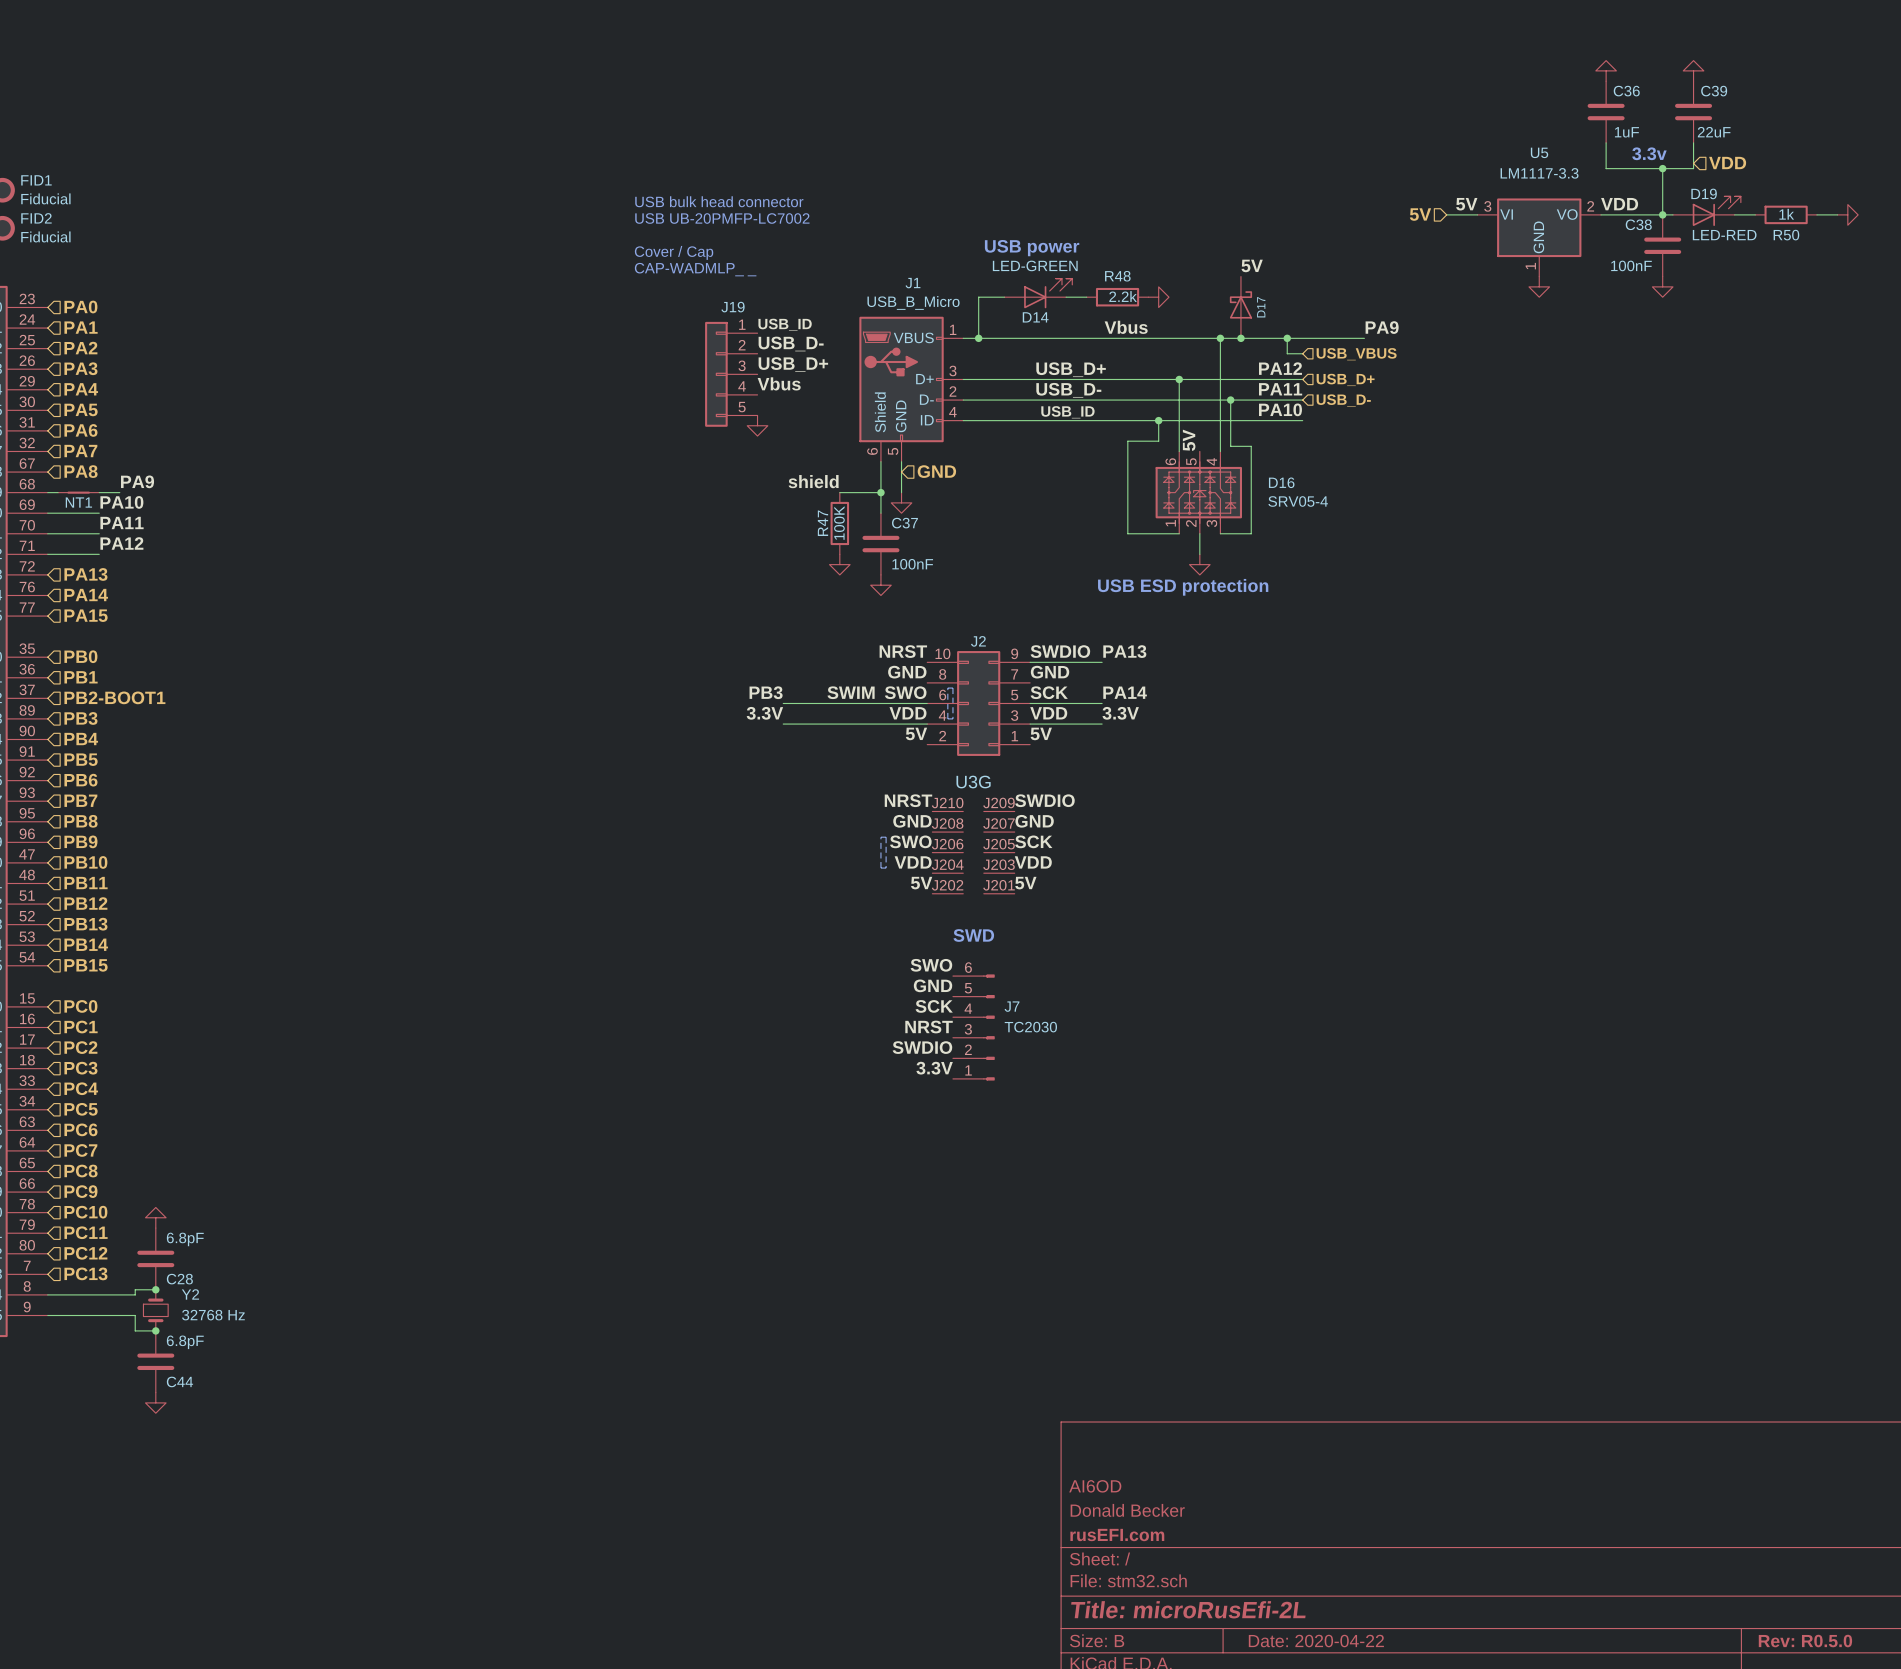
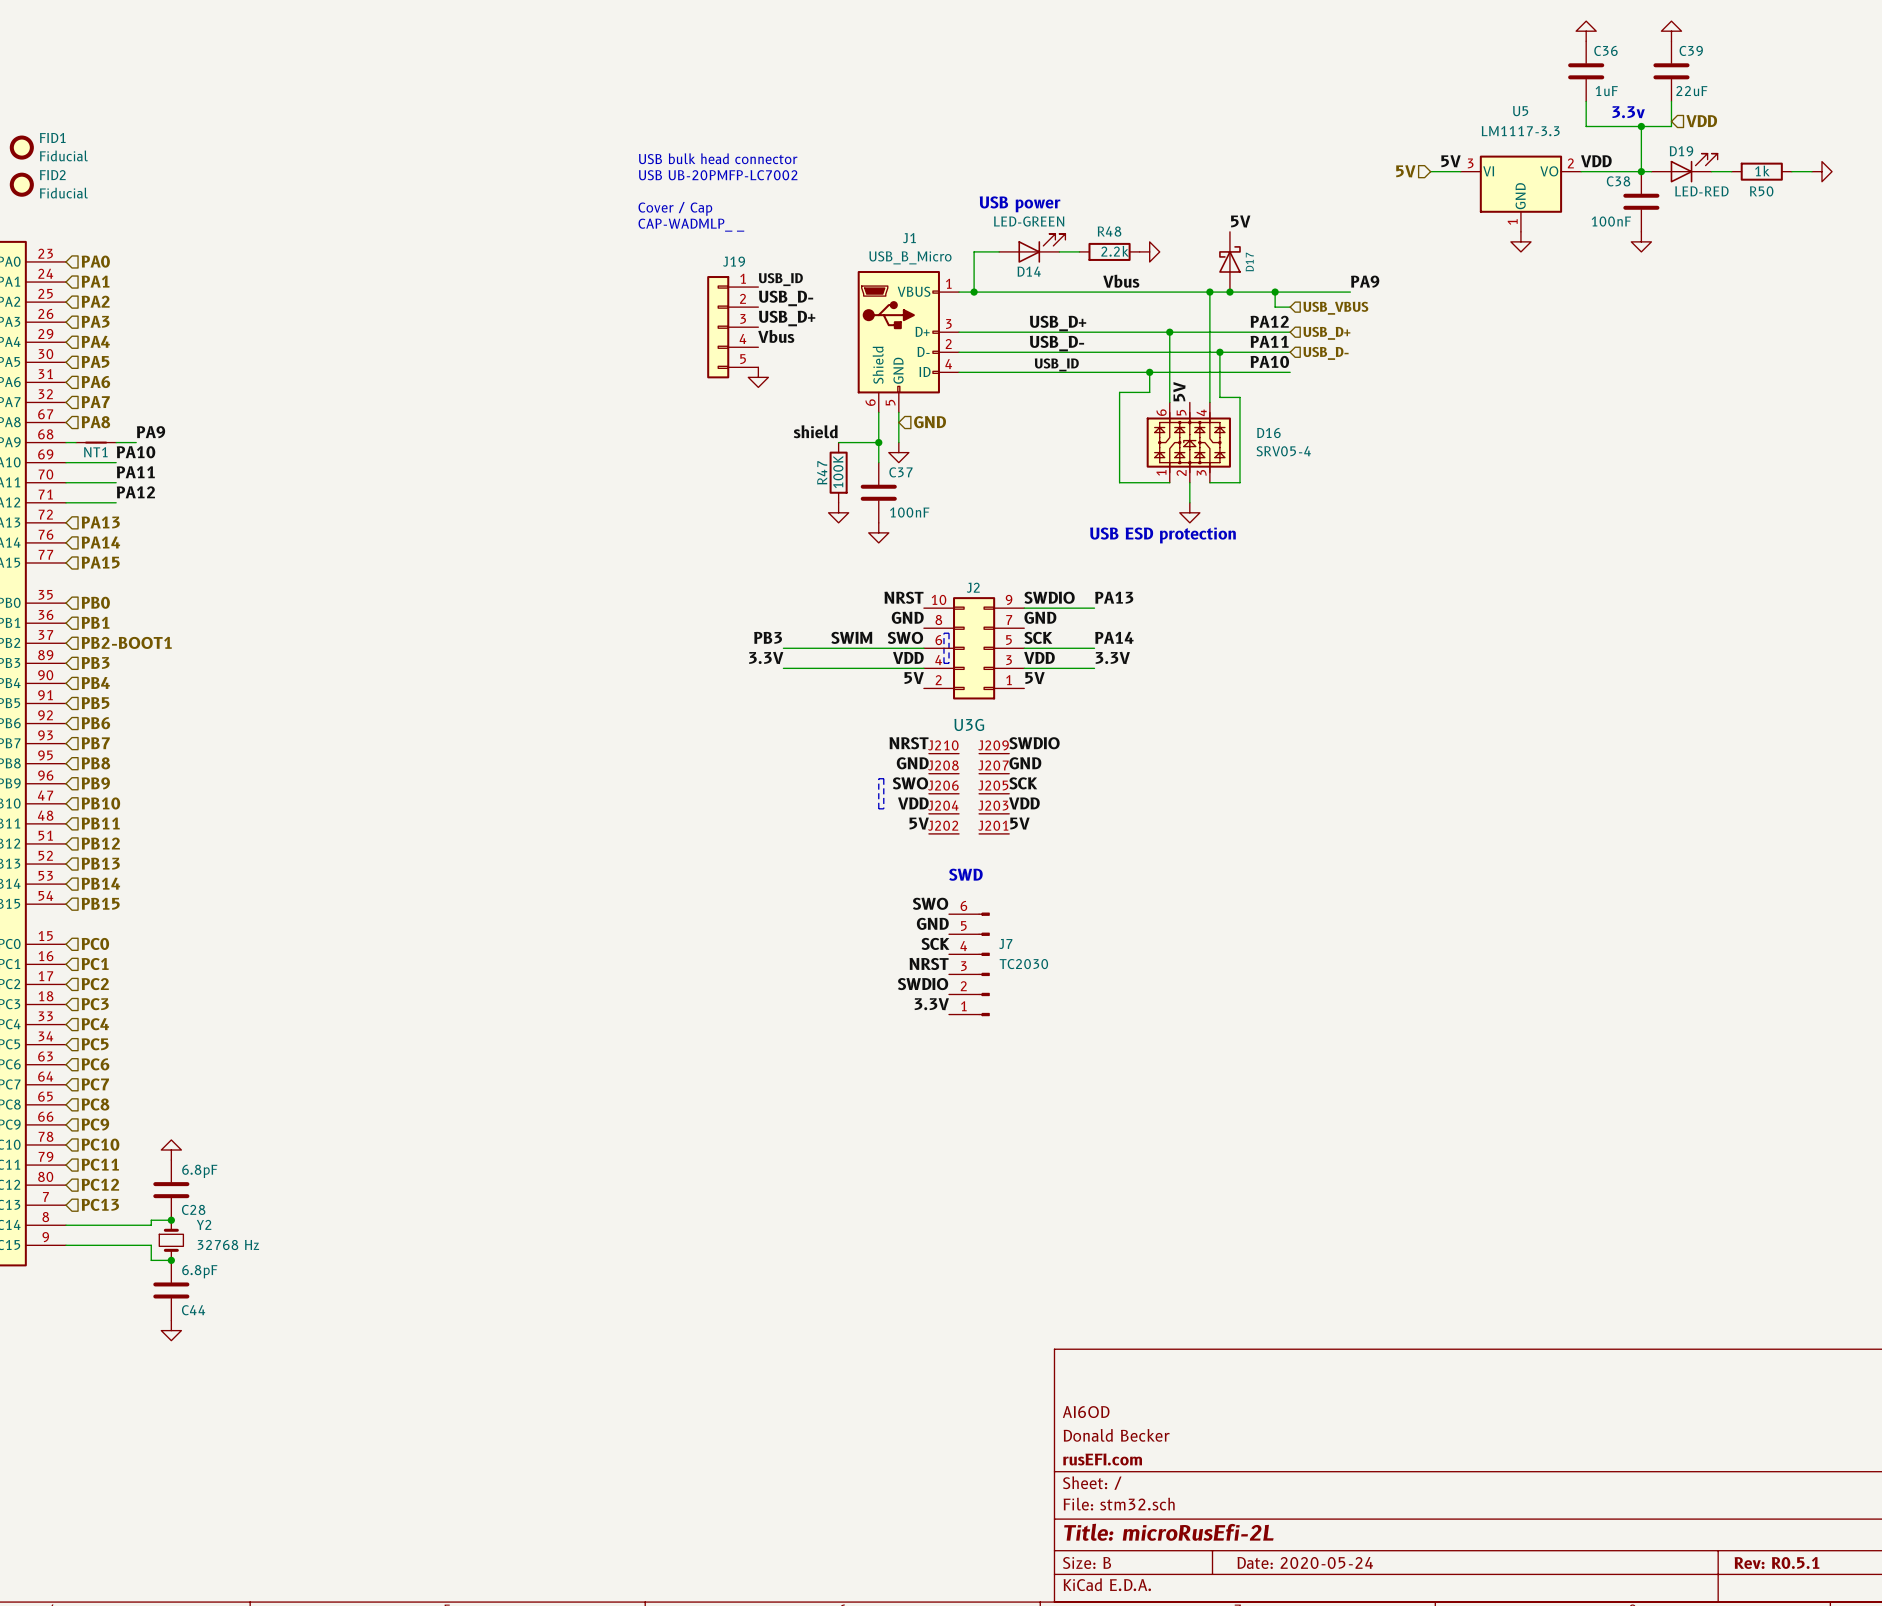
title block: Date: 2020-04-22 (1316, 1641) -> Date: 2020-05-24 (1305, 1562)
title block: Rev: R0.5.0 (1805, 1641) -> Rev: R0.5.1 (1777, 1563)

